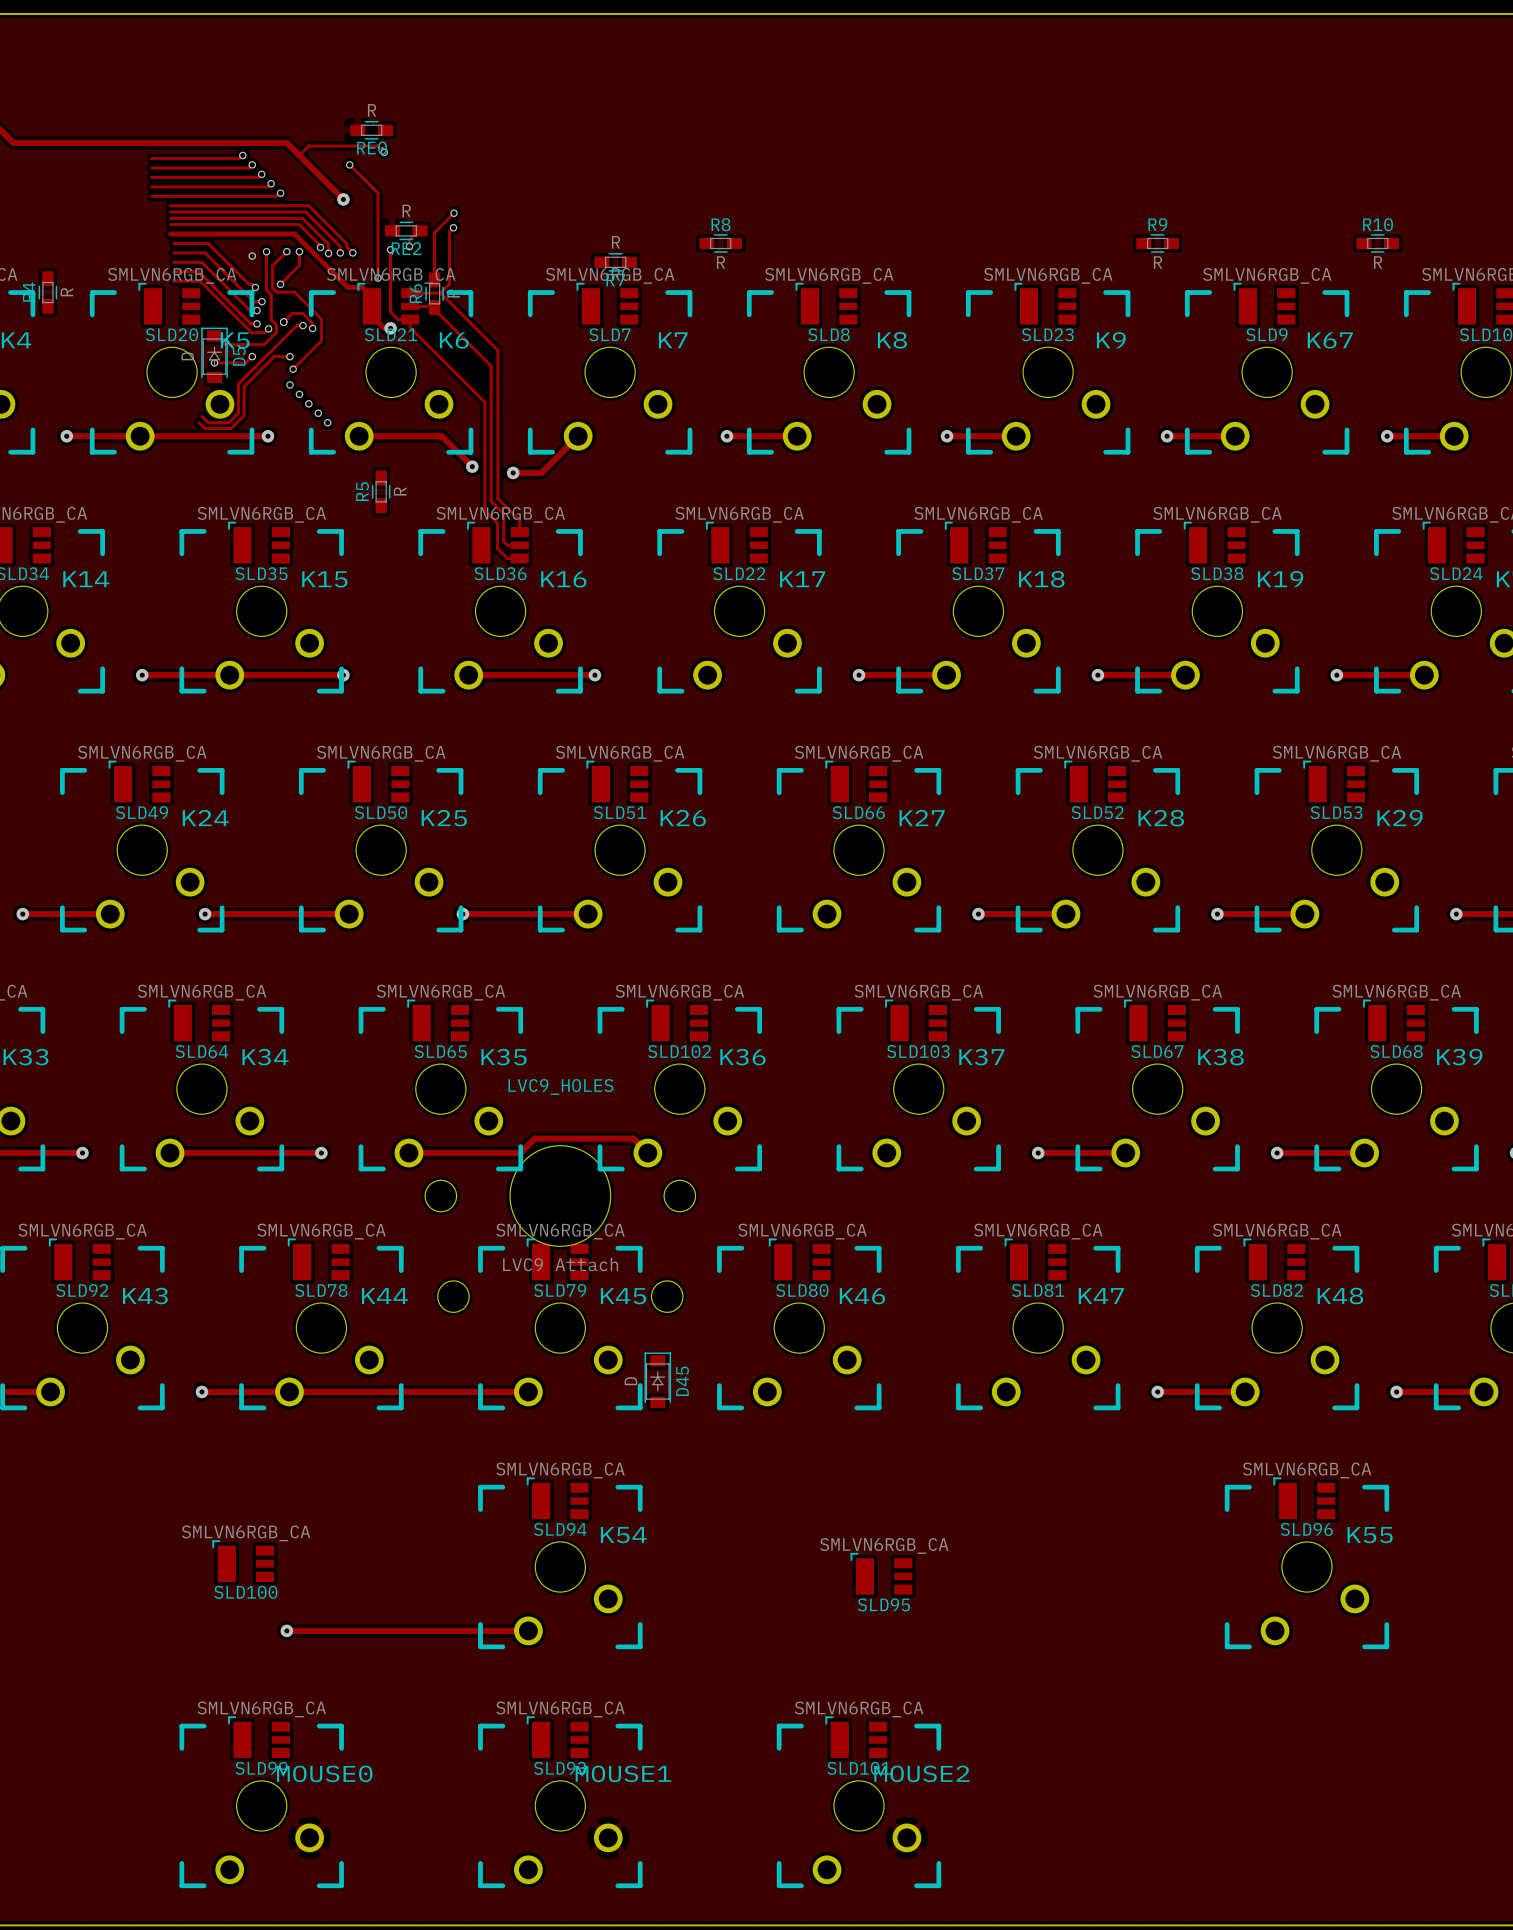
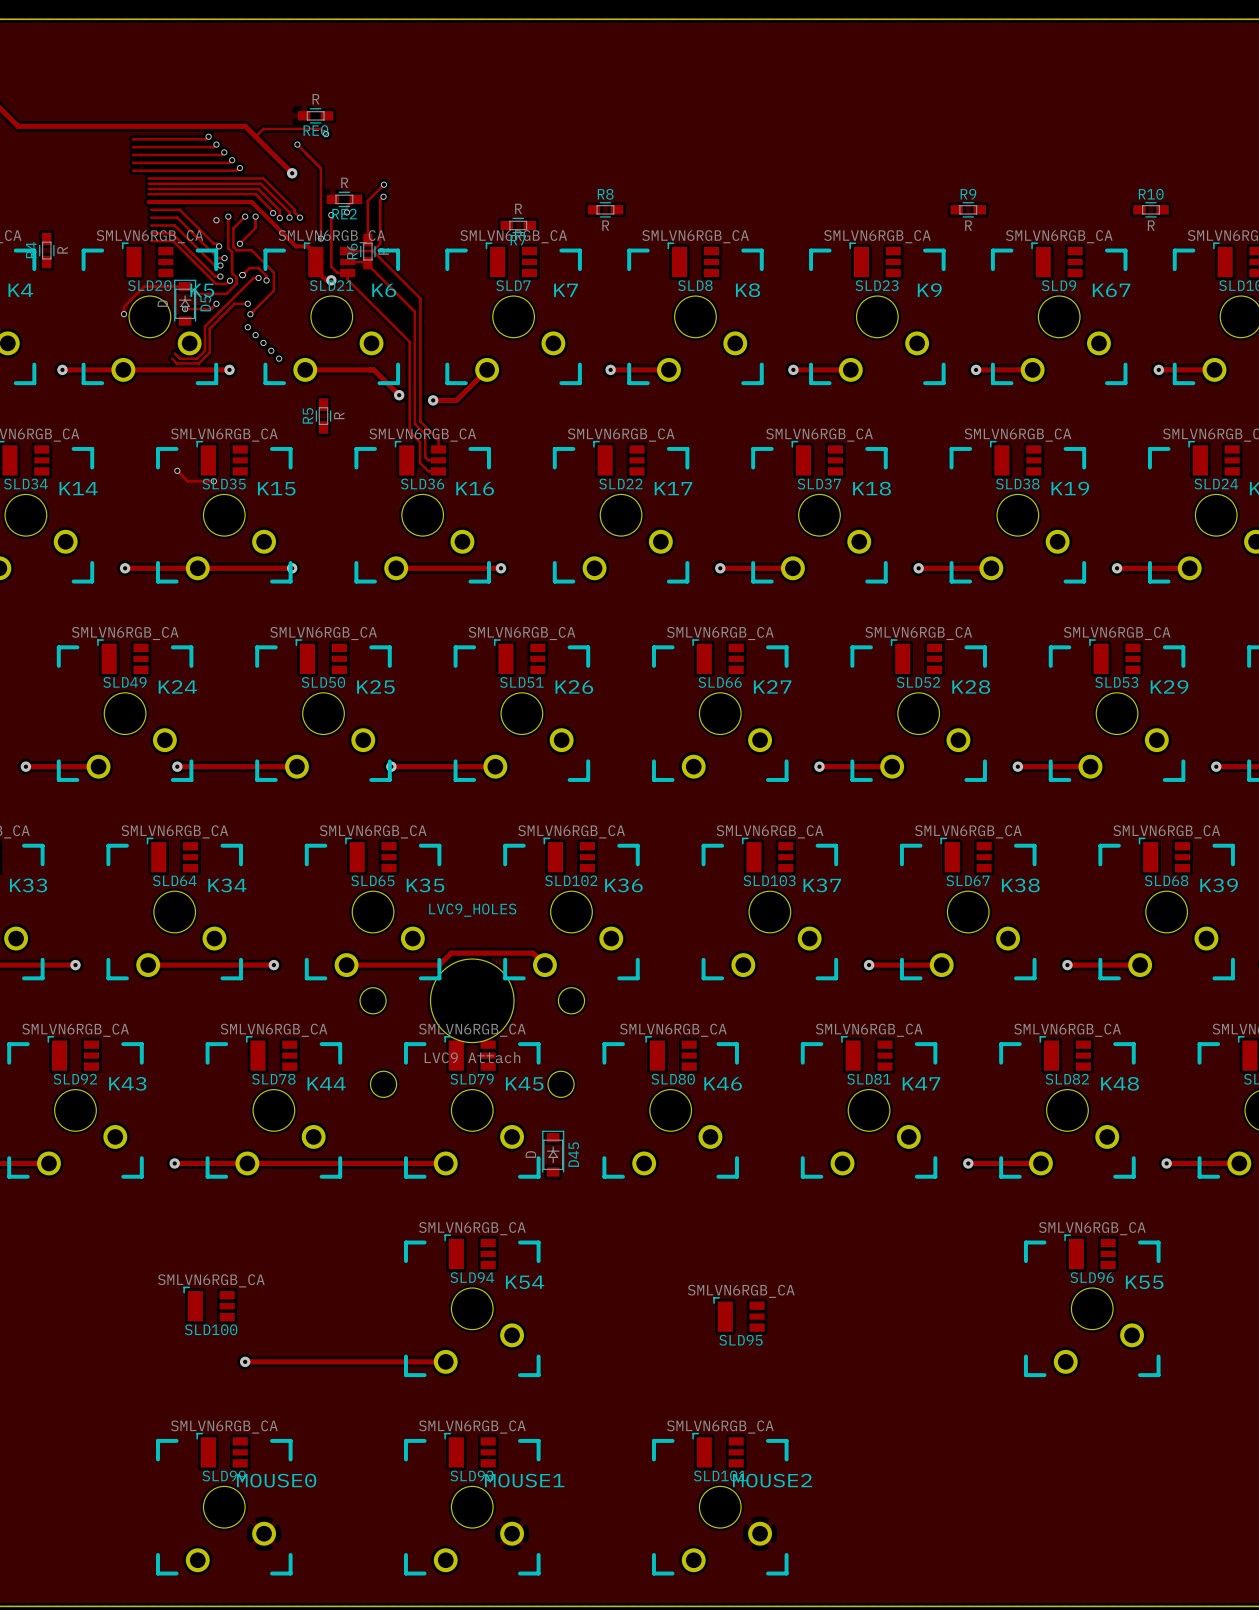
track: none -> (185, 286) (144, 286) (124, 306) (124, 314)
via: none -> (124, 314)
track: none -> (177, 470) (187, 481) (213, 481)
via: none -> (177, 470)
via: none -> (213, 481)

